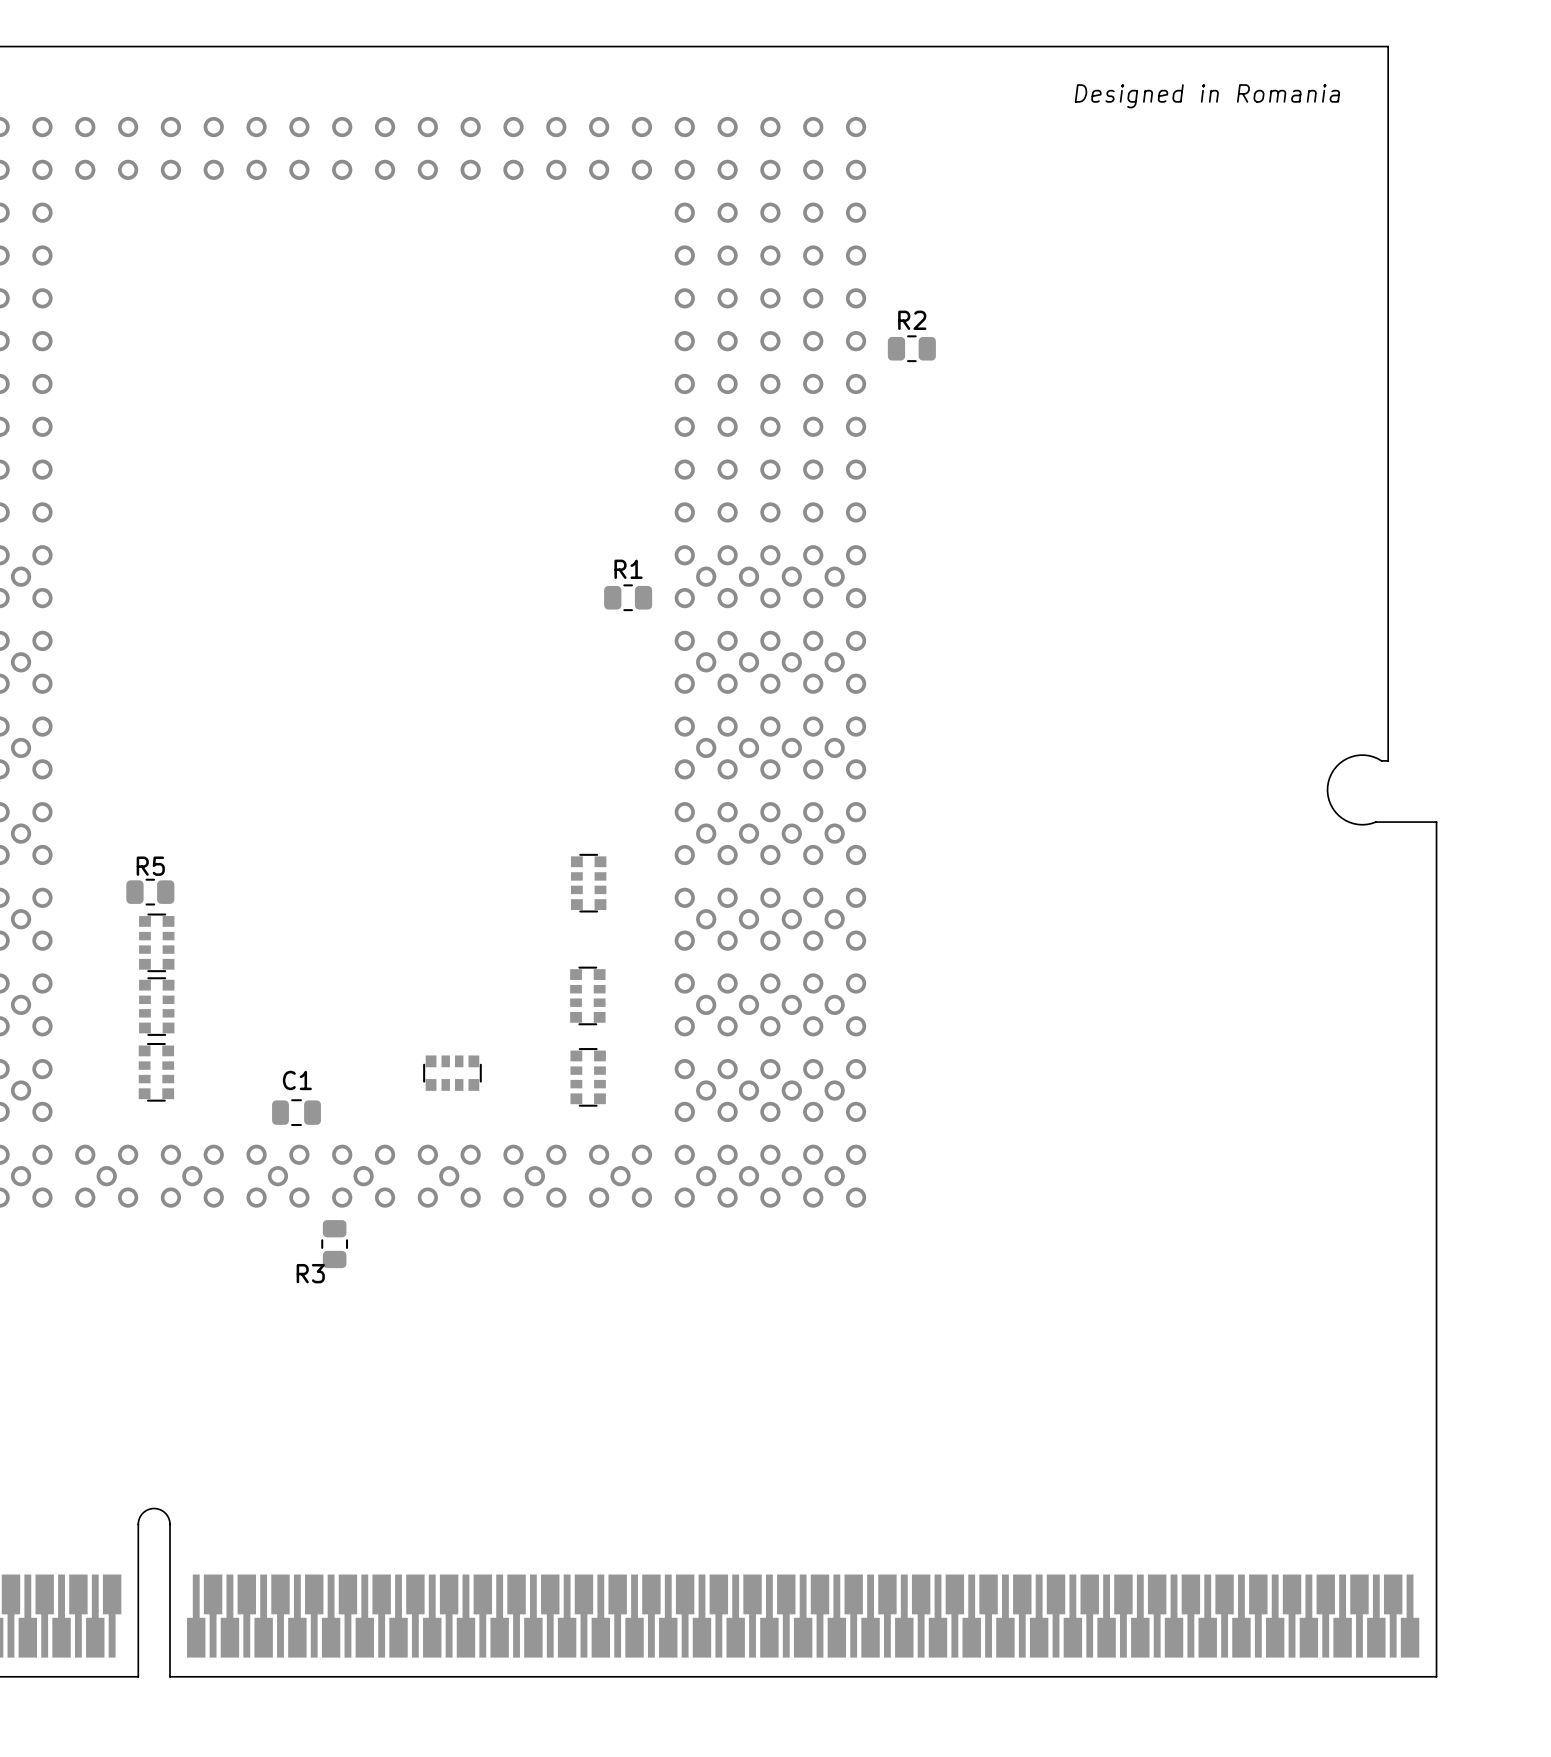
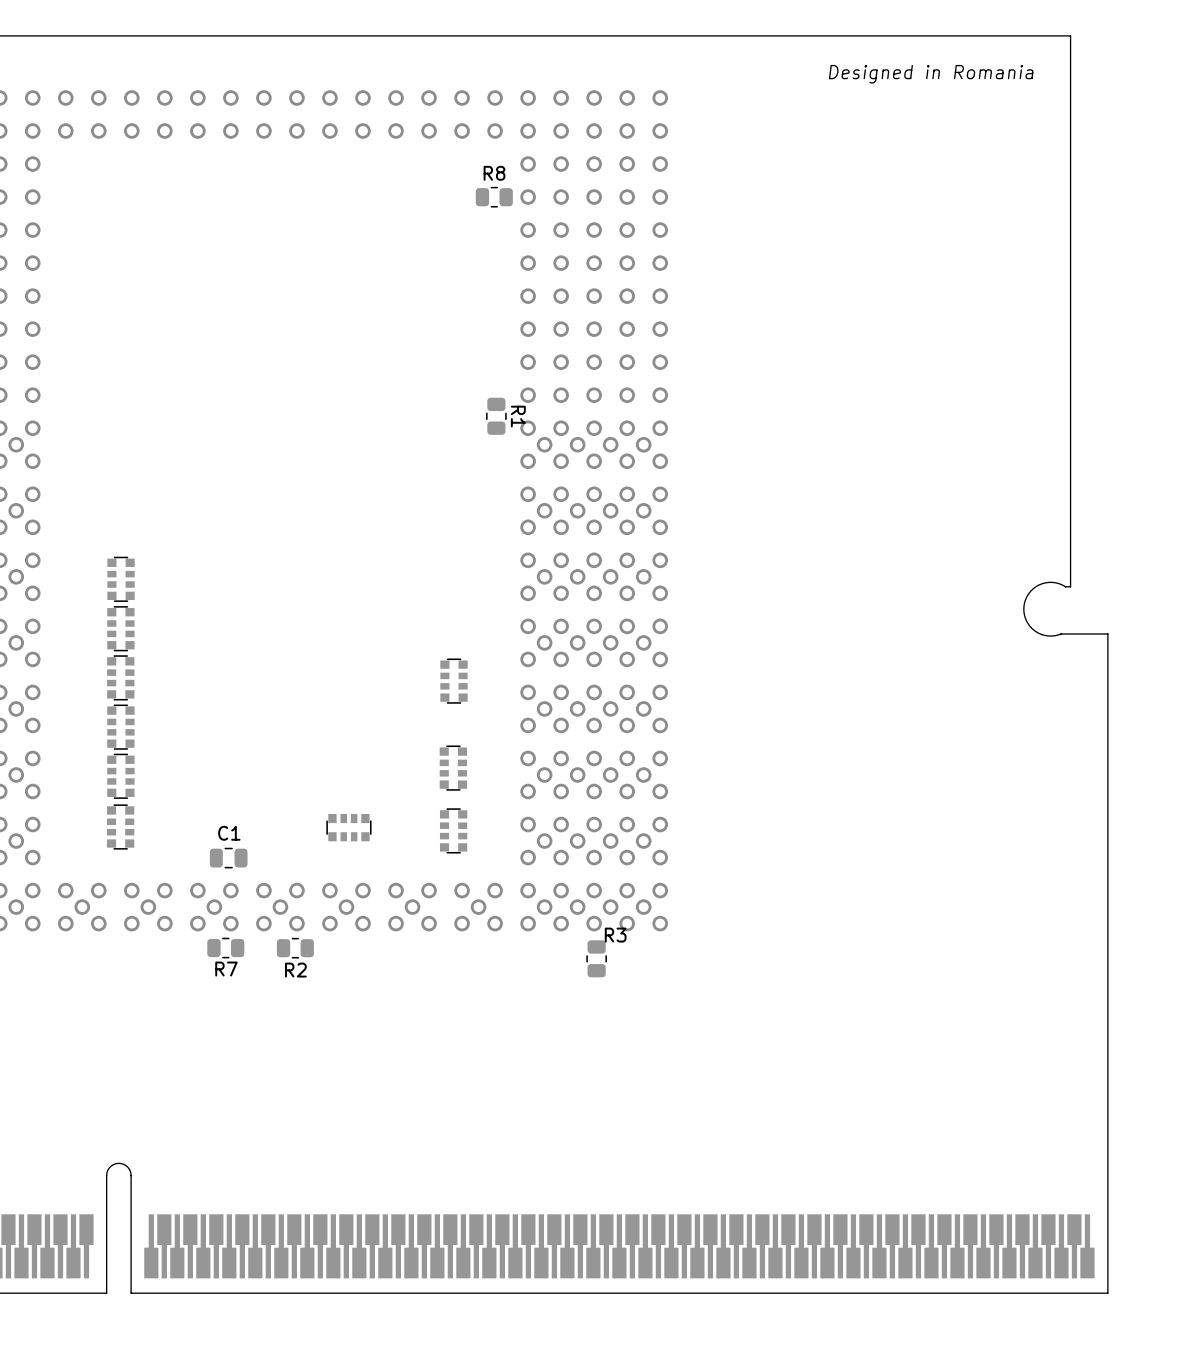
R8: none -> (494, 197)
R2 name position: R2 (912, 320) -> R2 (295, 970)
R2 position: (911, 348) -> (295, 948)
R1 rotation: 0° (628, 597) -> 90° clockwise (496, 416)
R1 position: (628, 597) -> (496, 416)
part: none -> (121, 579)
part: none -> (120, 628)
part: none -> (120, 677)
R5: (150, 892) -> none
R7: none -> (225, 948)
R3 position: (334, 1244) -> (596, 958)
R3 name position: R3 (310, 1273) -> R3 (615, 935)

